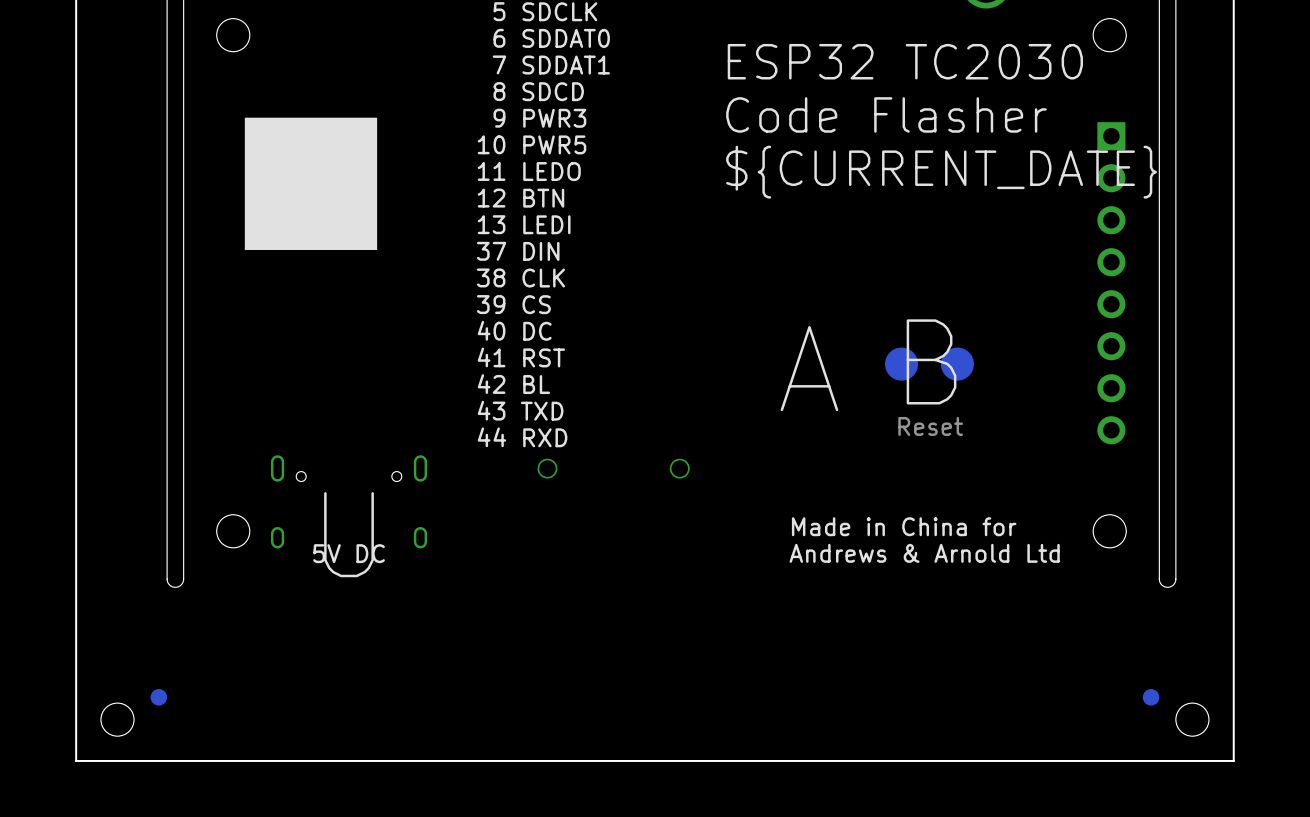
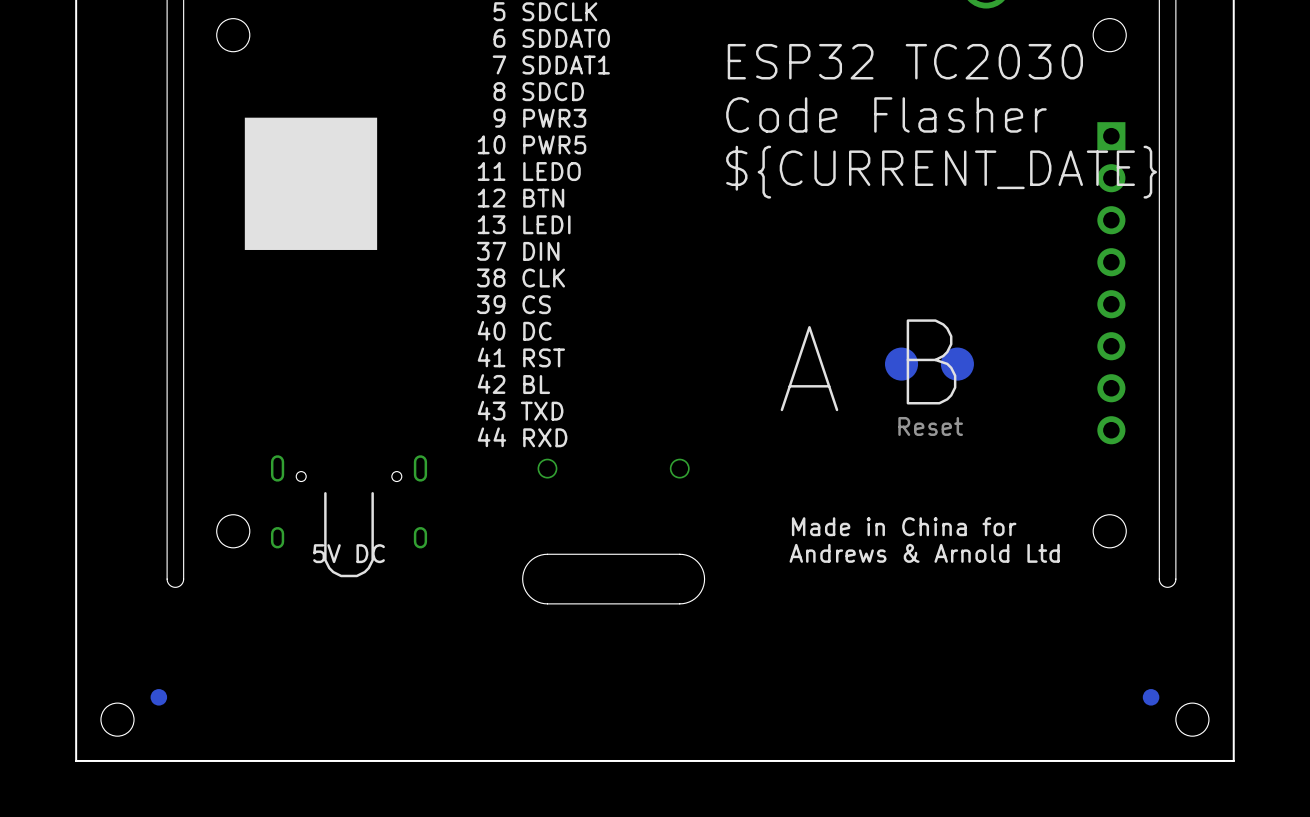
board edge: none -> (679, 554) (544, 554) (535, 557) (527, 563) (523, 572) (522, 582) (529, 596) (544, 603) (683, 603) (692, 600) (699, 594) (703, 585) (704, 575) (701, 566) (694, 559) (679, 554)

